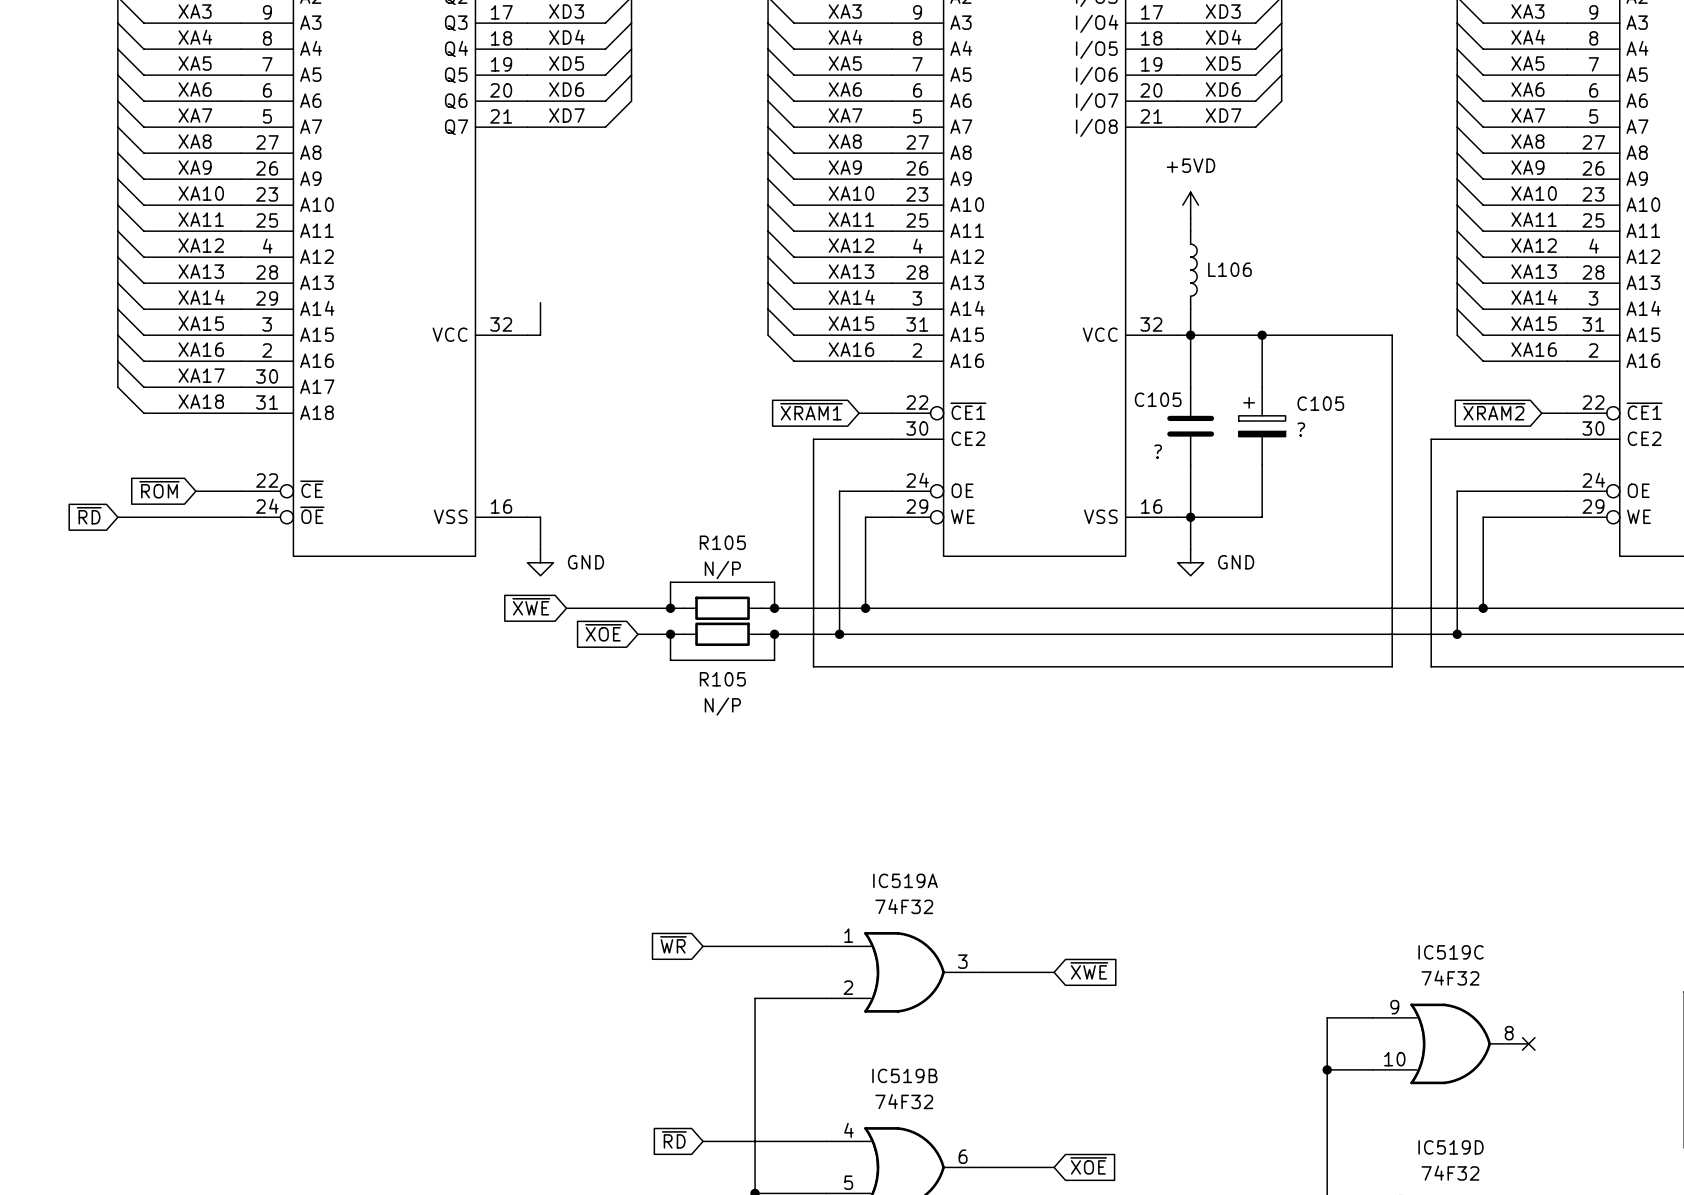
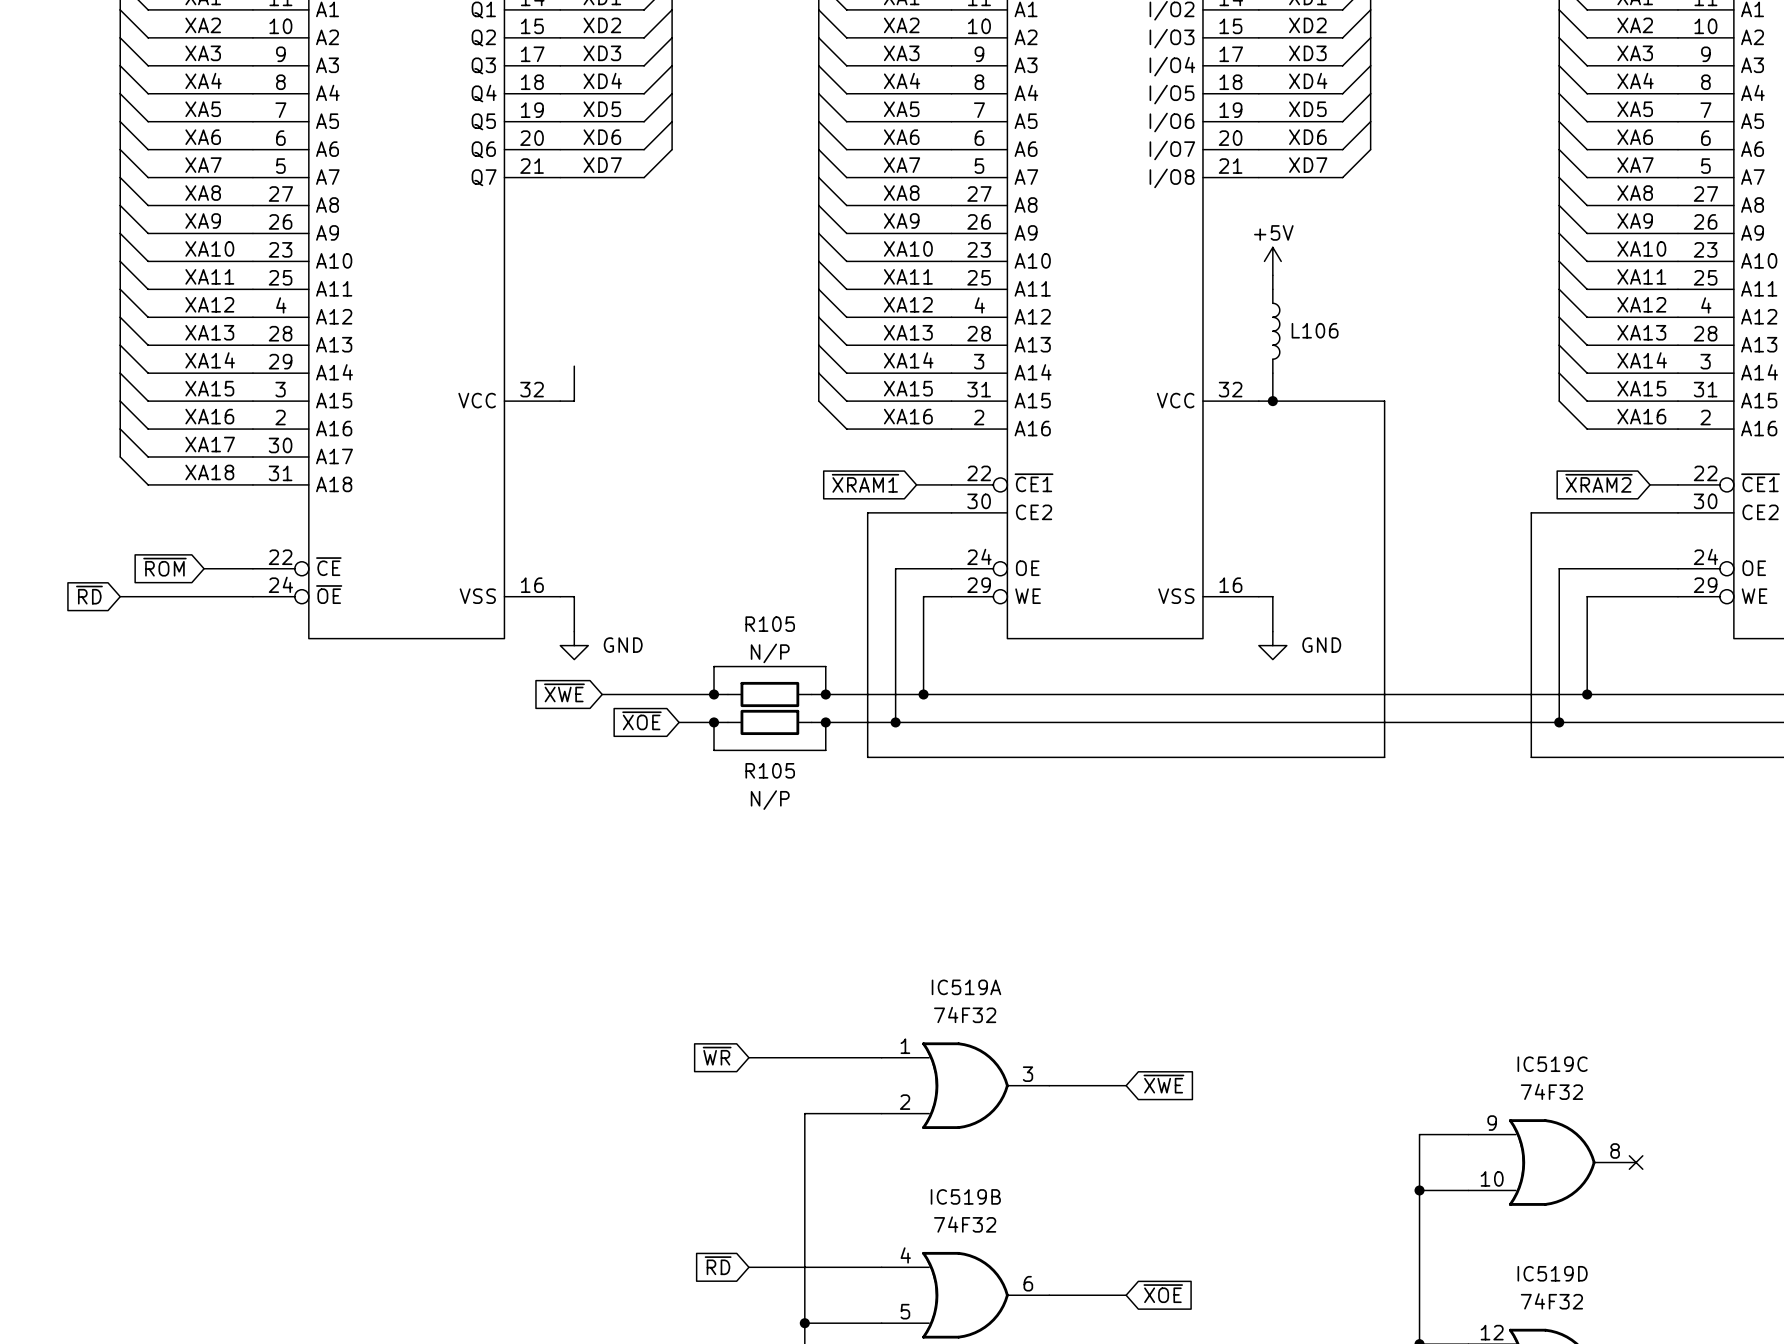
power symbol: +5VD (1190, 205) -> +5V (1272, 261)
wire: (1190, 335) (1190, 387) -> none
wire: (1262, 335) (1262, 387) -> none
junction: (1262, 335) -> none
wire: (1294, 335) (1392, 335) (1392, 666) (1294, 666) -> (1384, 401) (1384, 757)
C105: ? (1190, 426) -> none
C105: ? (1262, 426) -> none
wire: (1190, 465) (1190, 517) (1262, 517) (1262, 465) -> none
junction: (1190, 517) -> none

